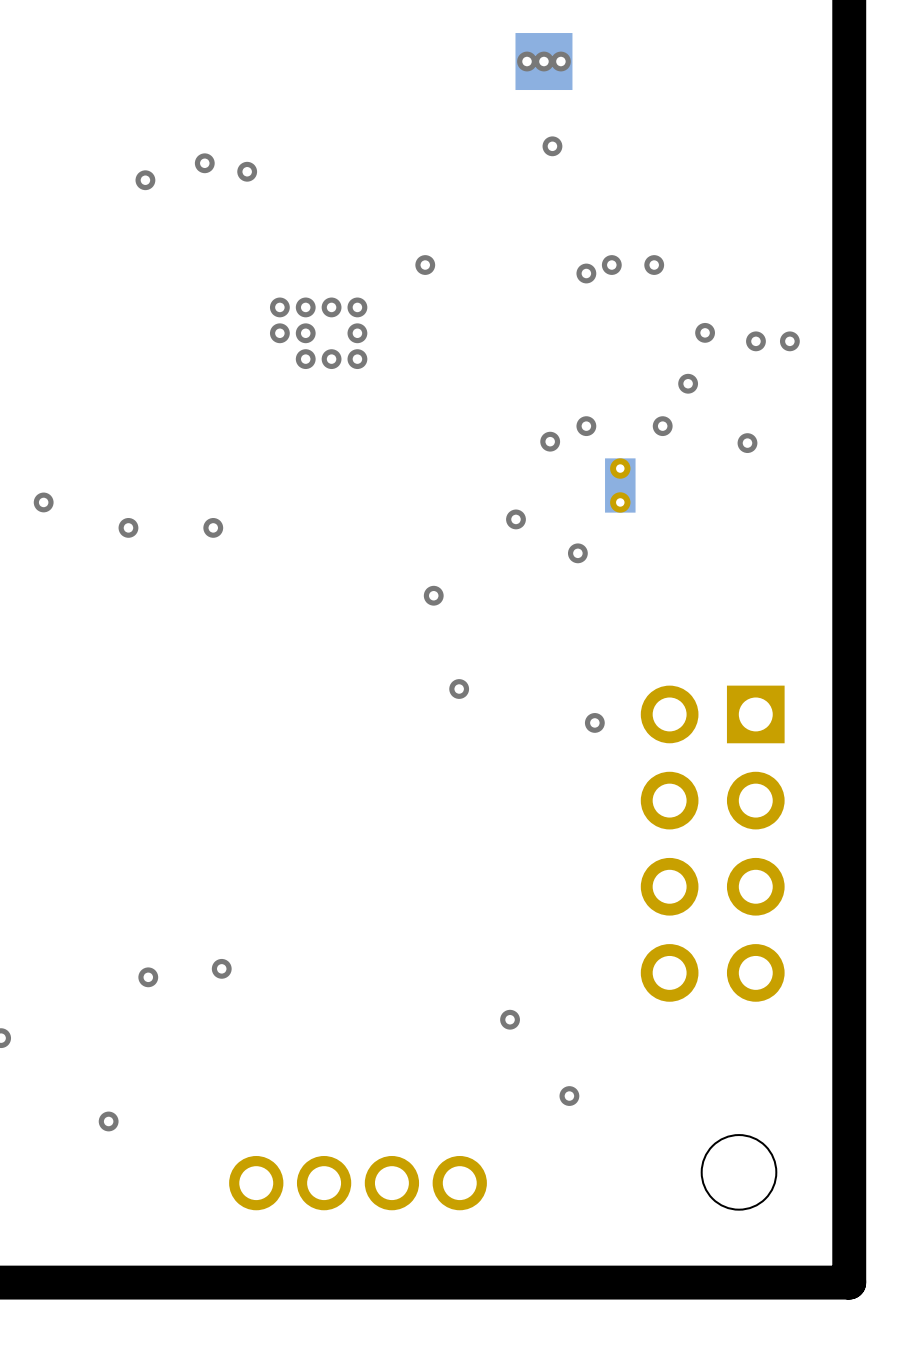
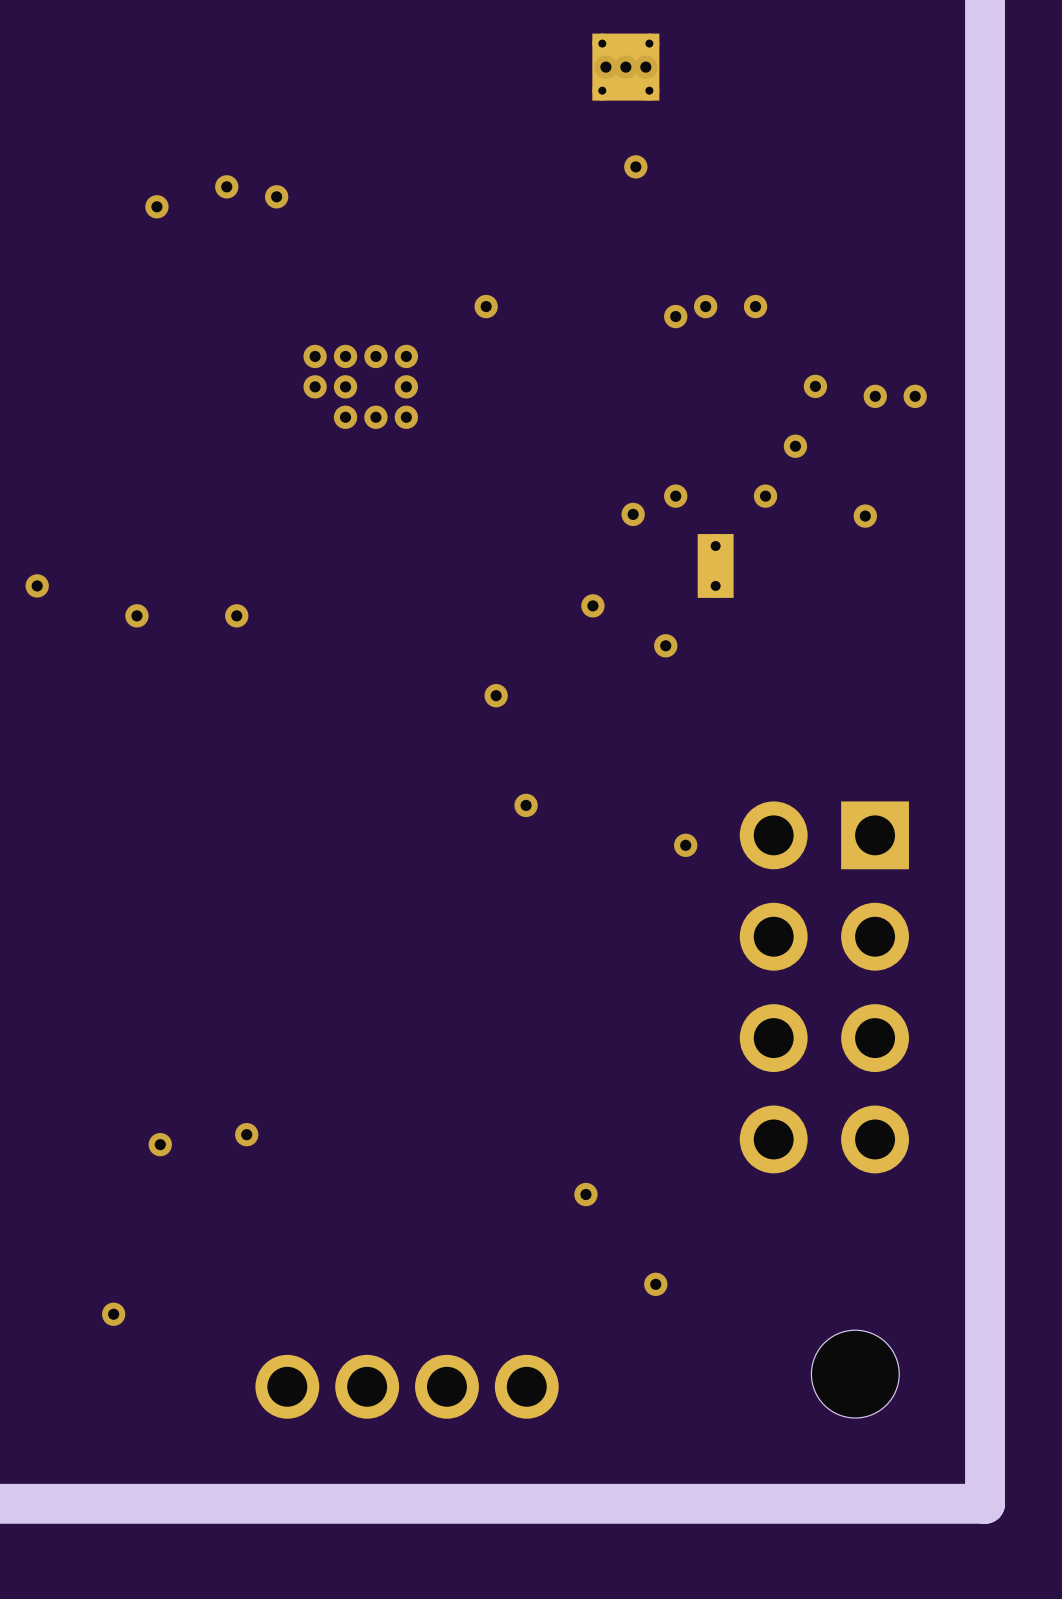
part footprint: [515, 33, 573, 91] -> [592, 33, 660, 101]

